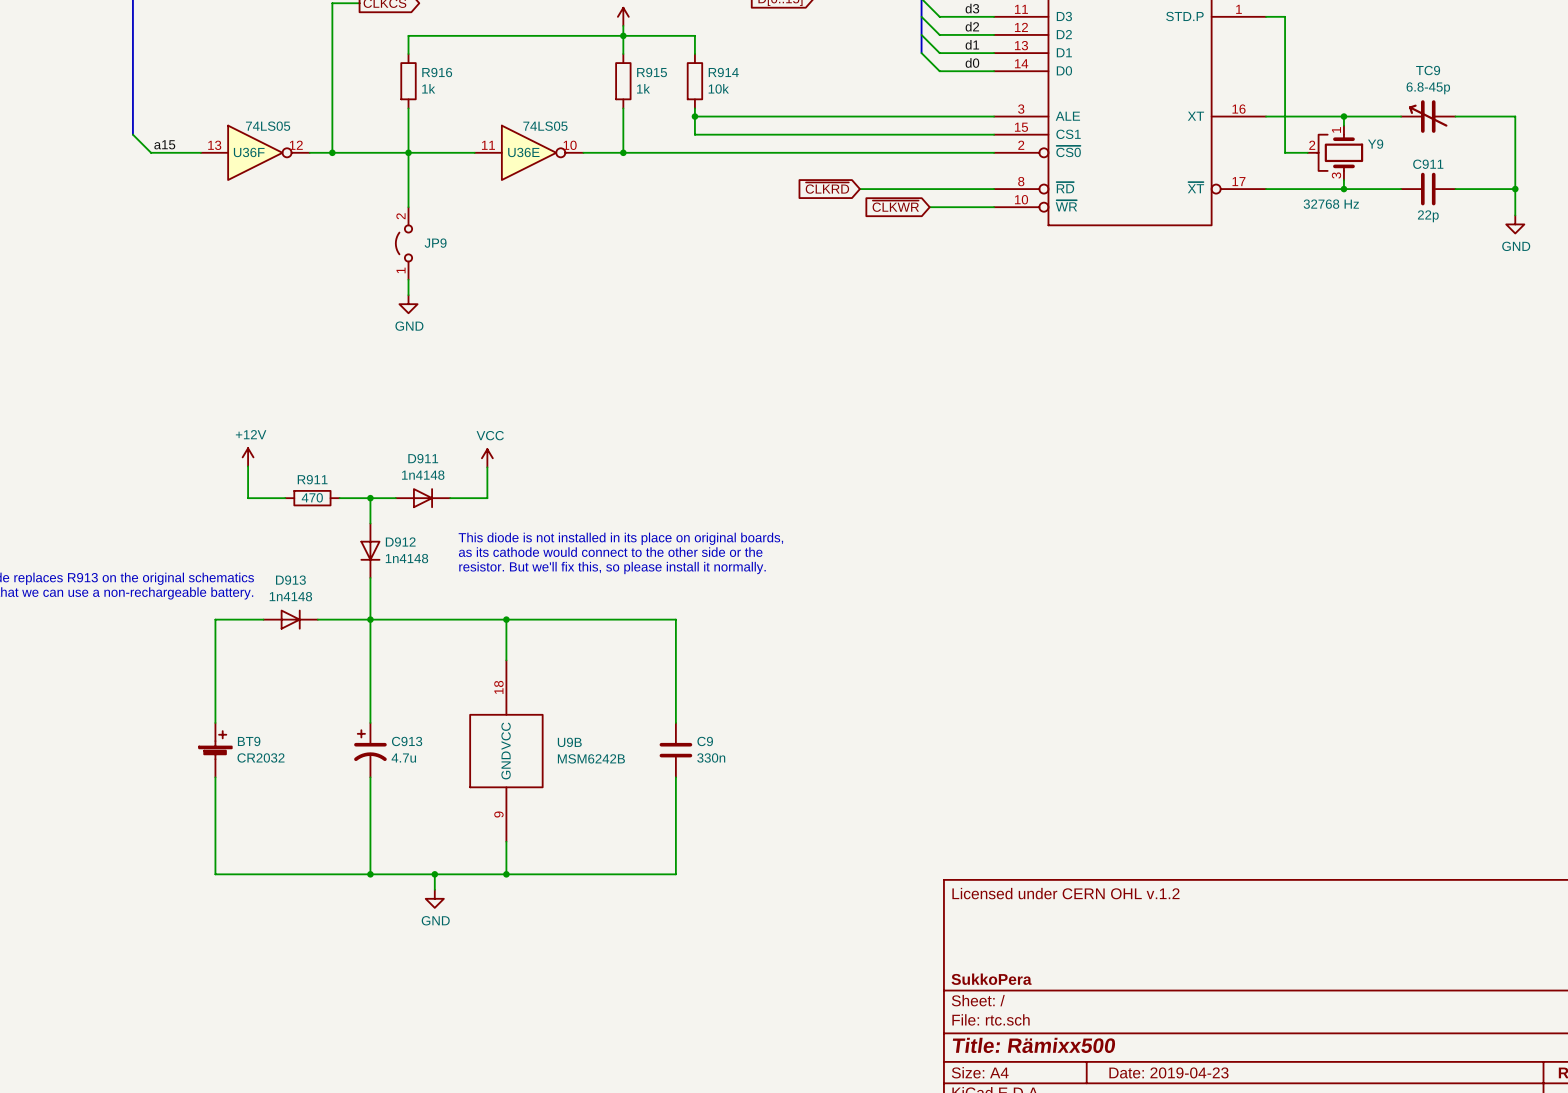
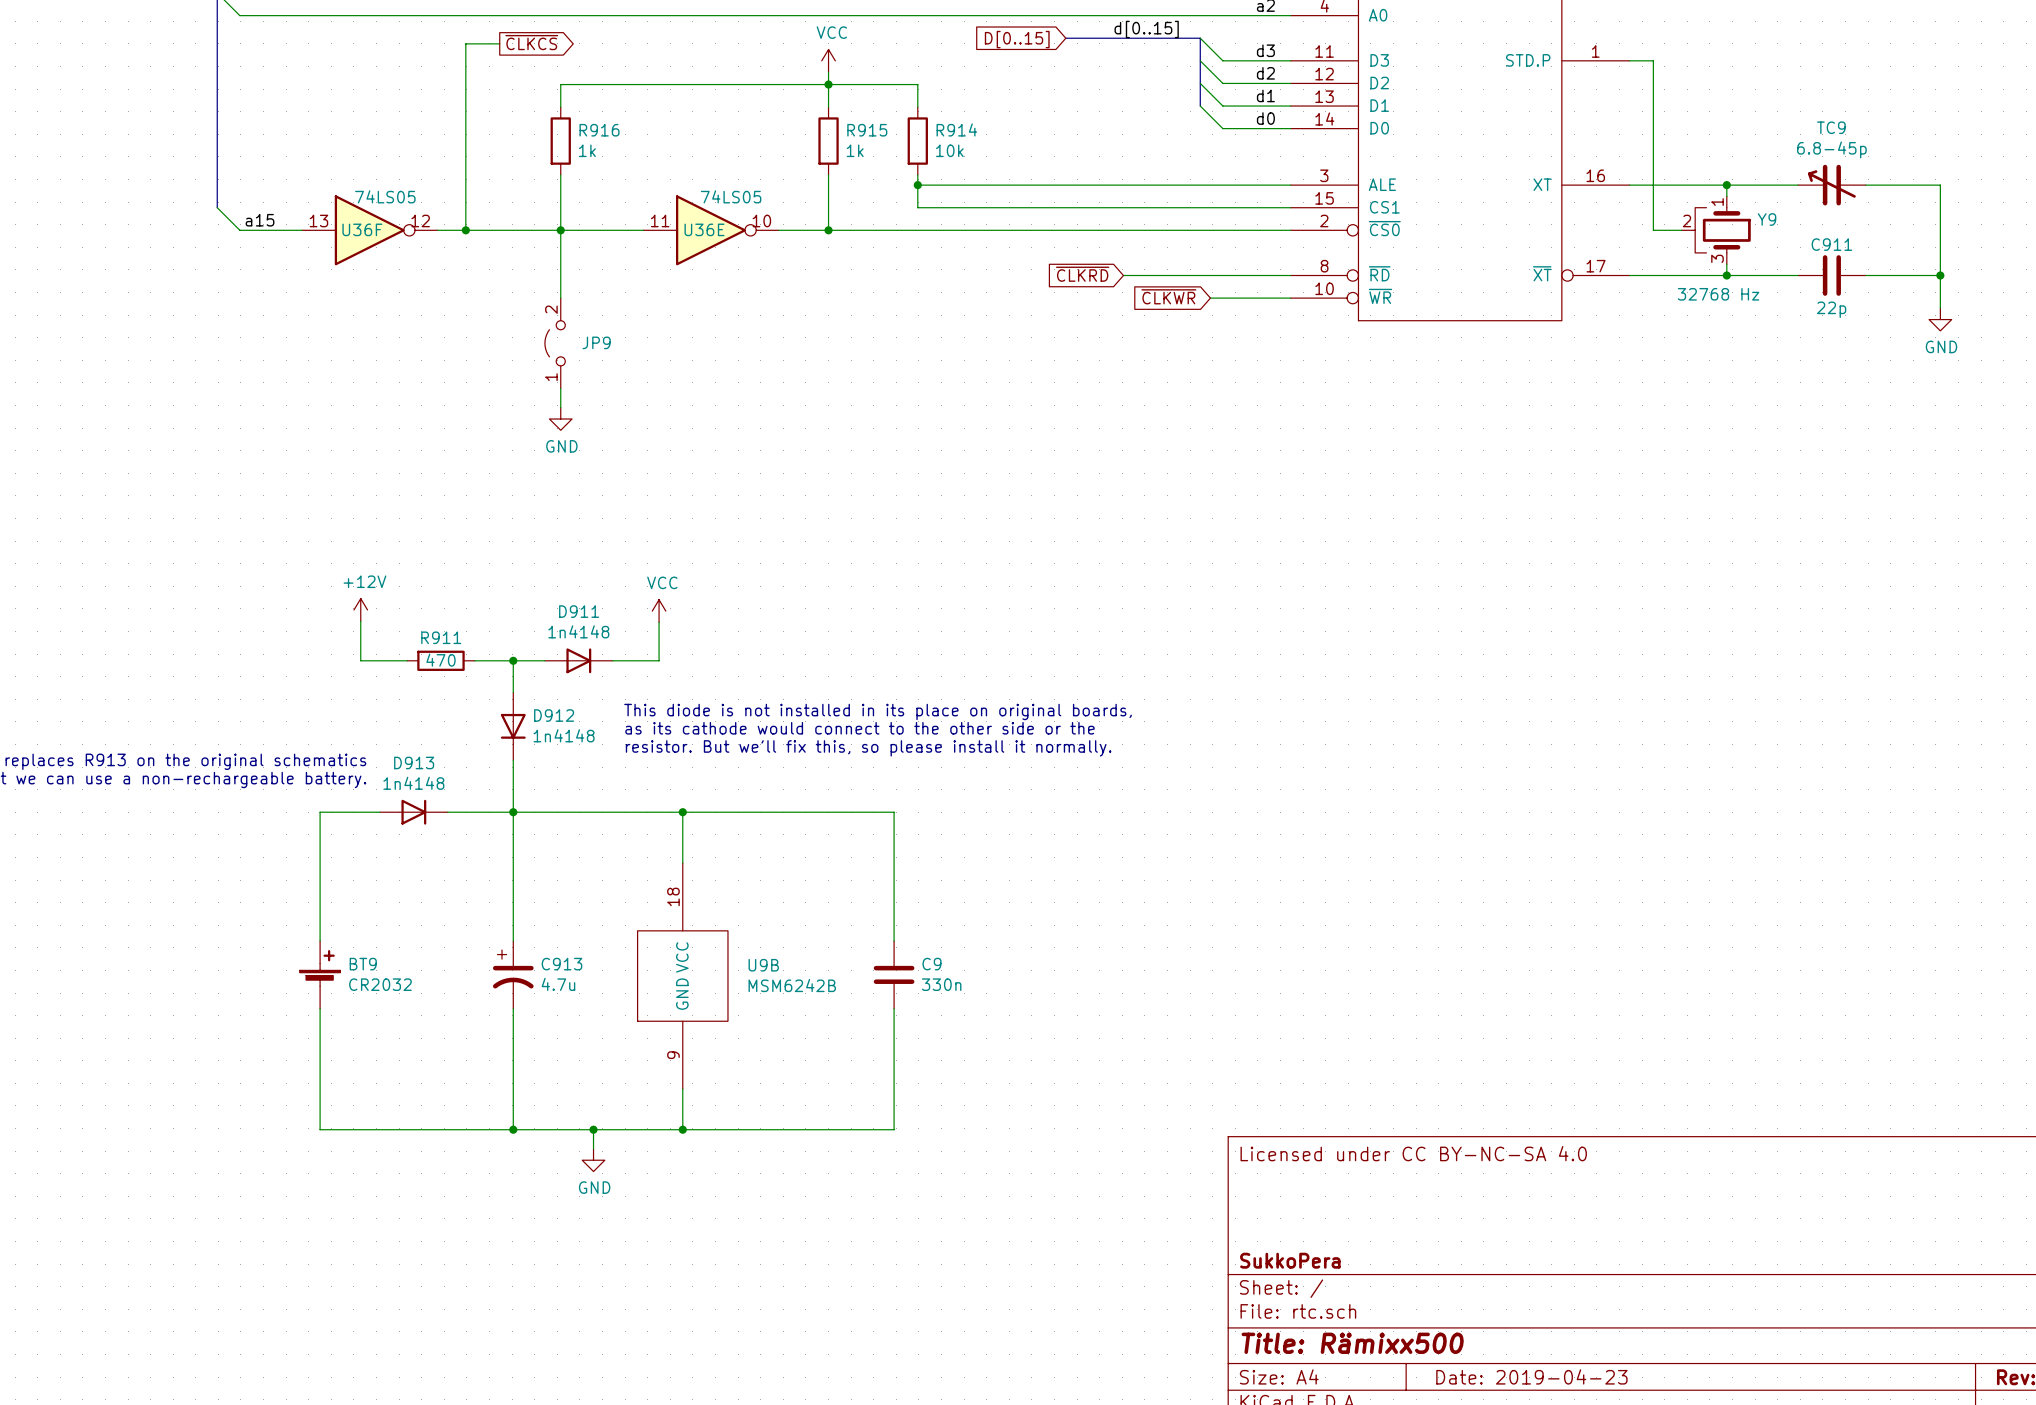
title block: Licensed under CERN OHL v.1.2 (1065, 893) -> Licensed under CC BY-NC-SA 4.0 (1413, 1153)

